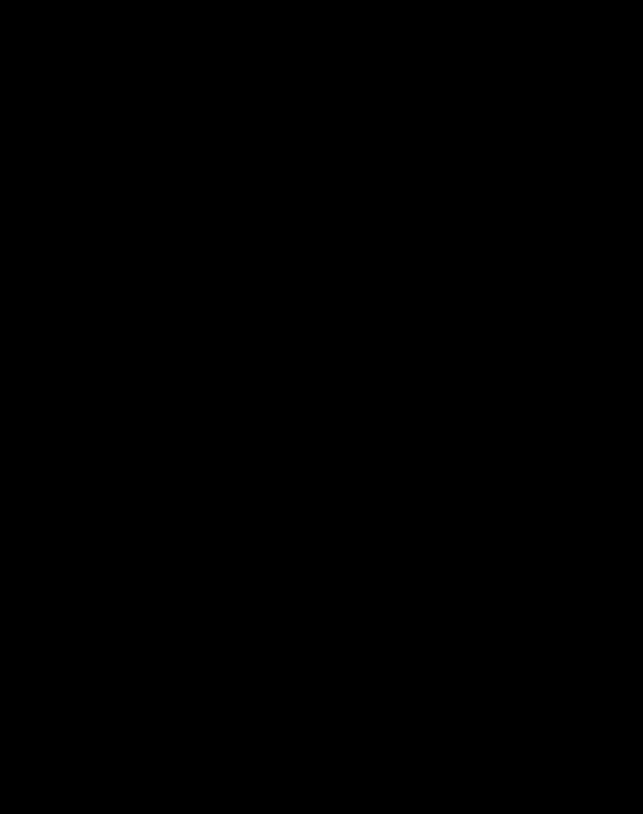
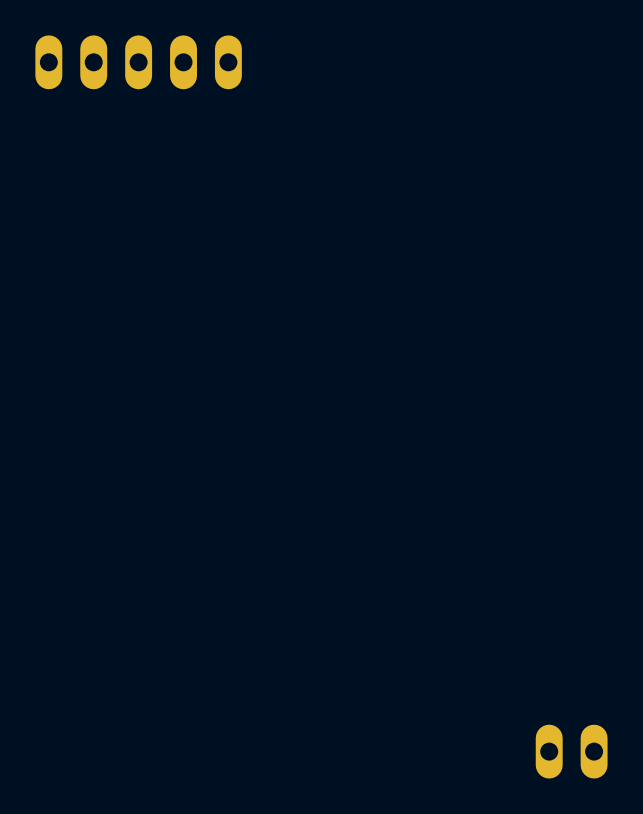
part: none -> (138, 62)
part: none -> (571, 751)

